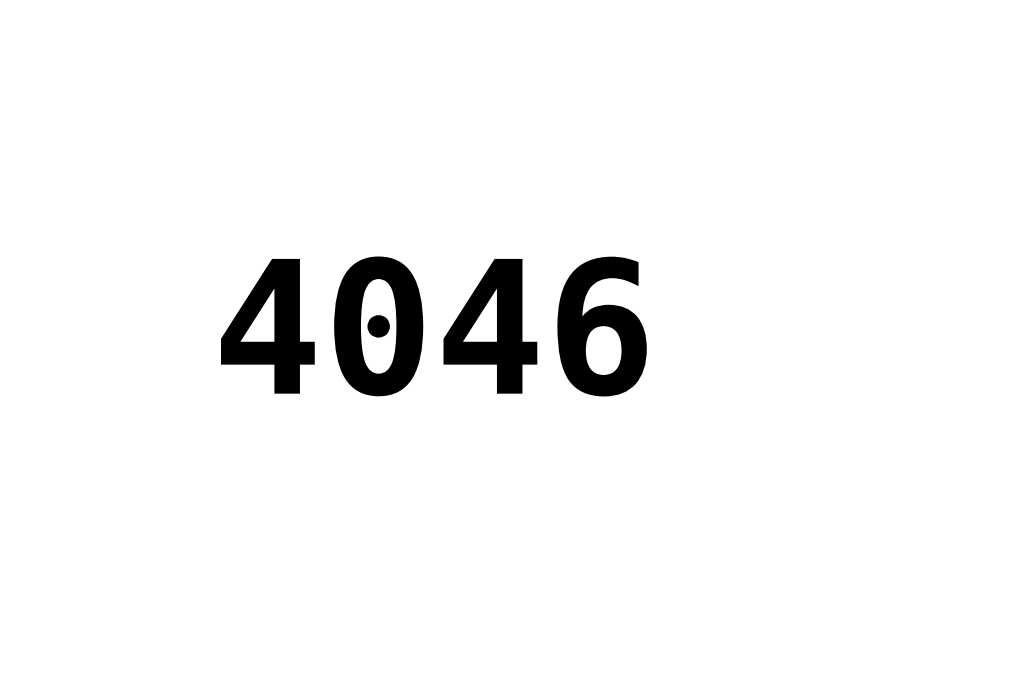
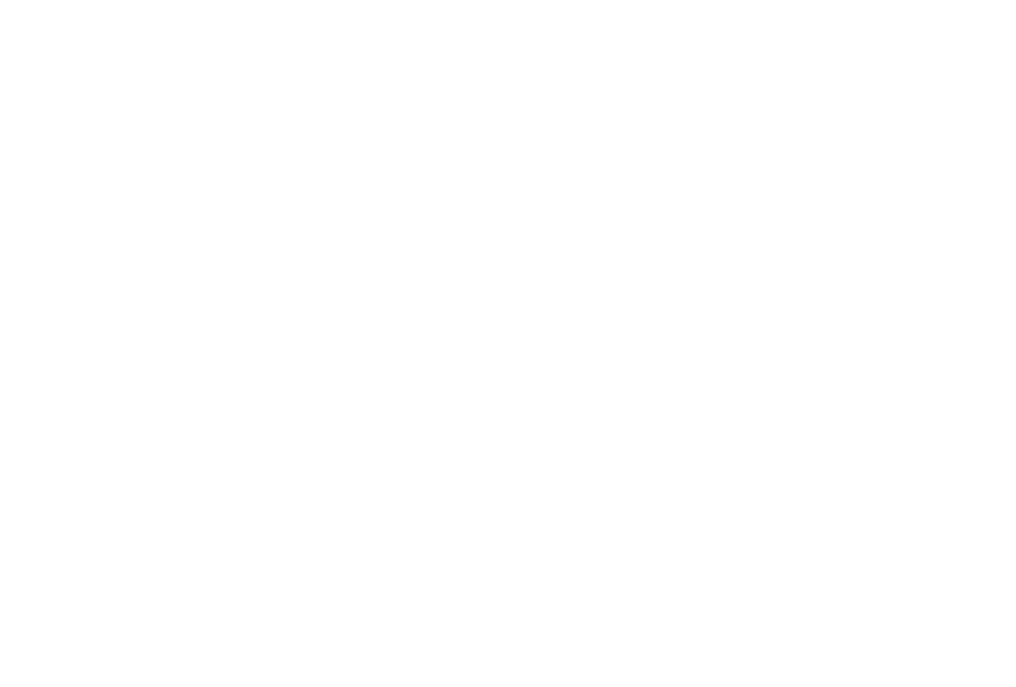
text: 4046 (433, 326) -> none

